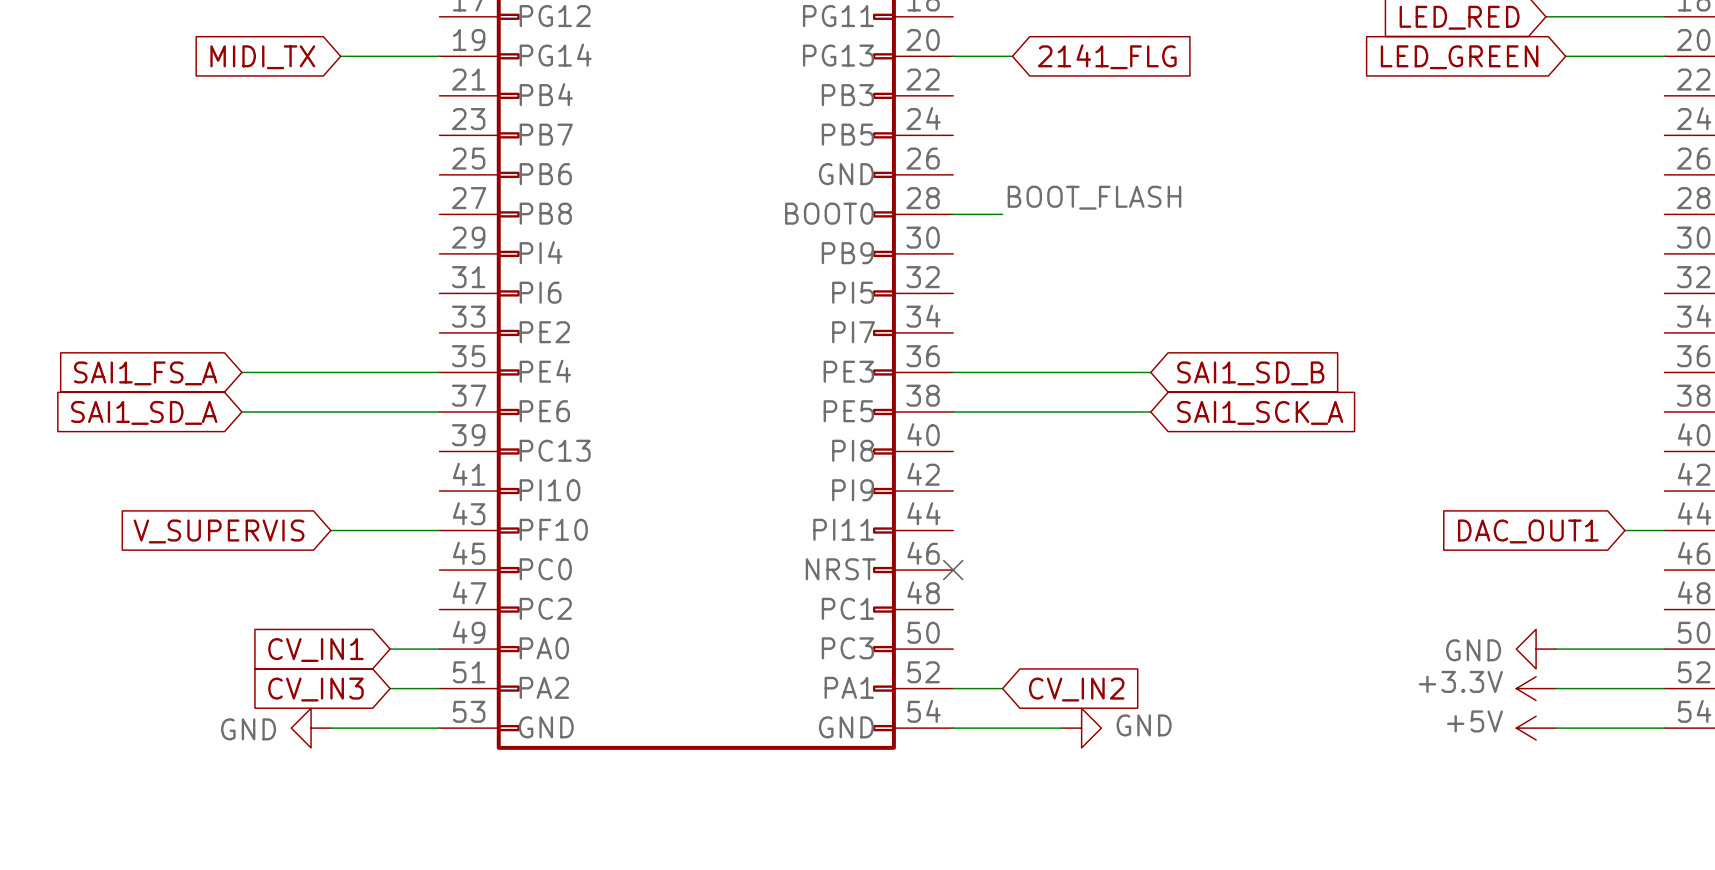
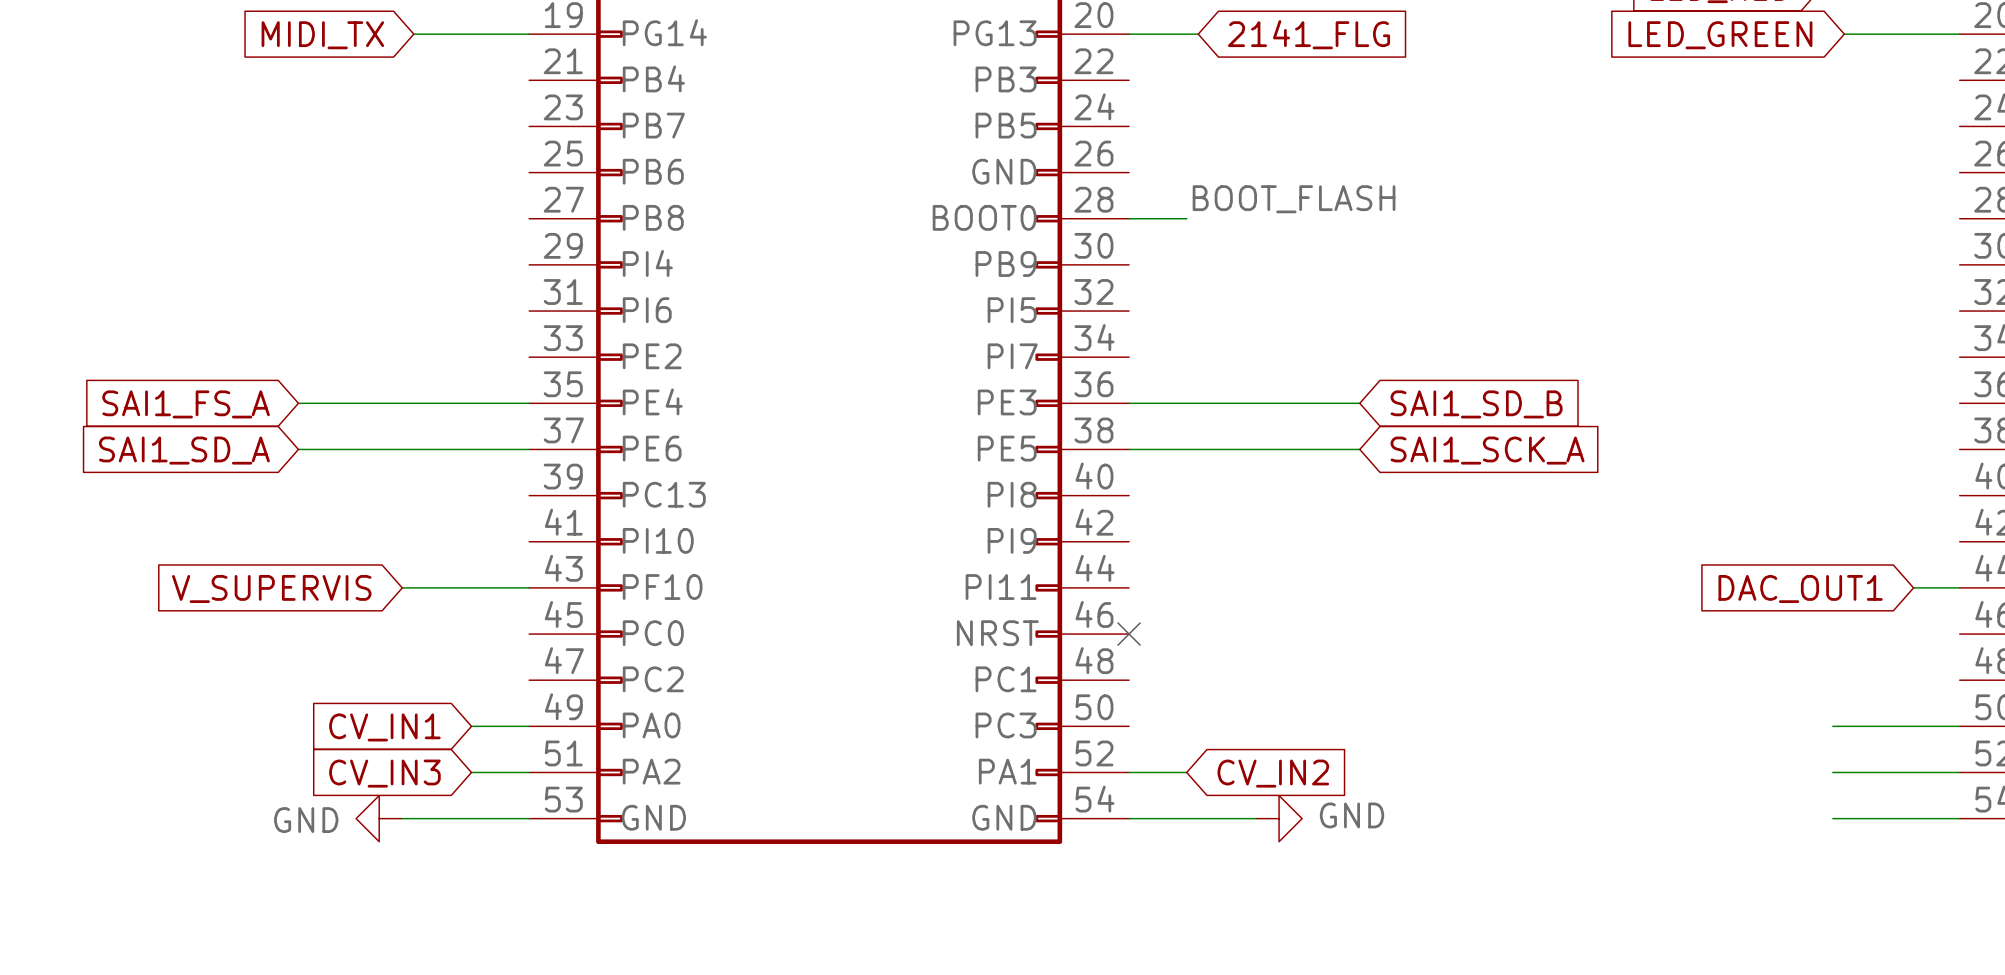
power symbol: GND (1536, 649) -> none
power symbol: +3.3V (1536, 688) -> none
power symbol: +5V (1536, 728) -> none

